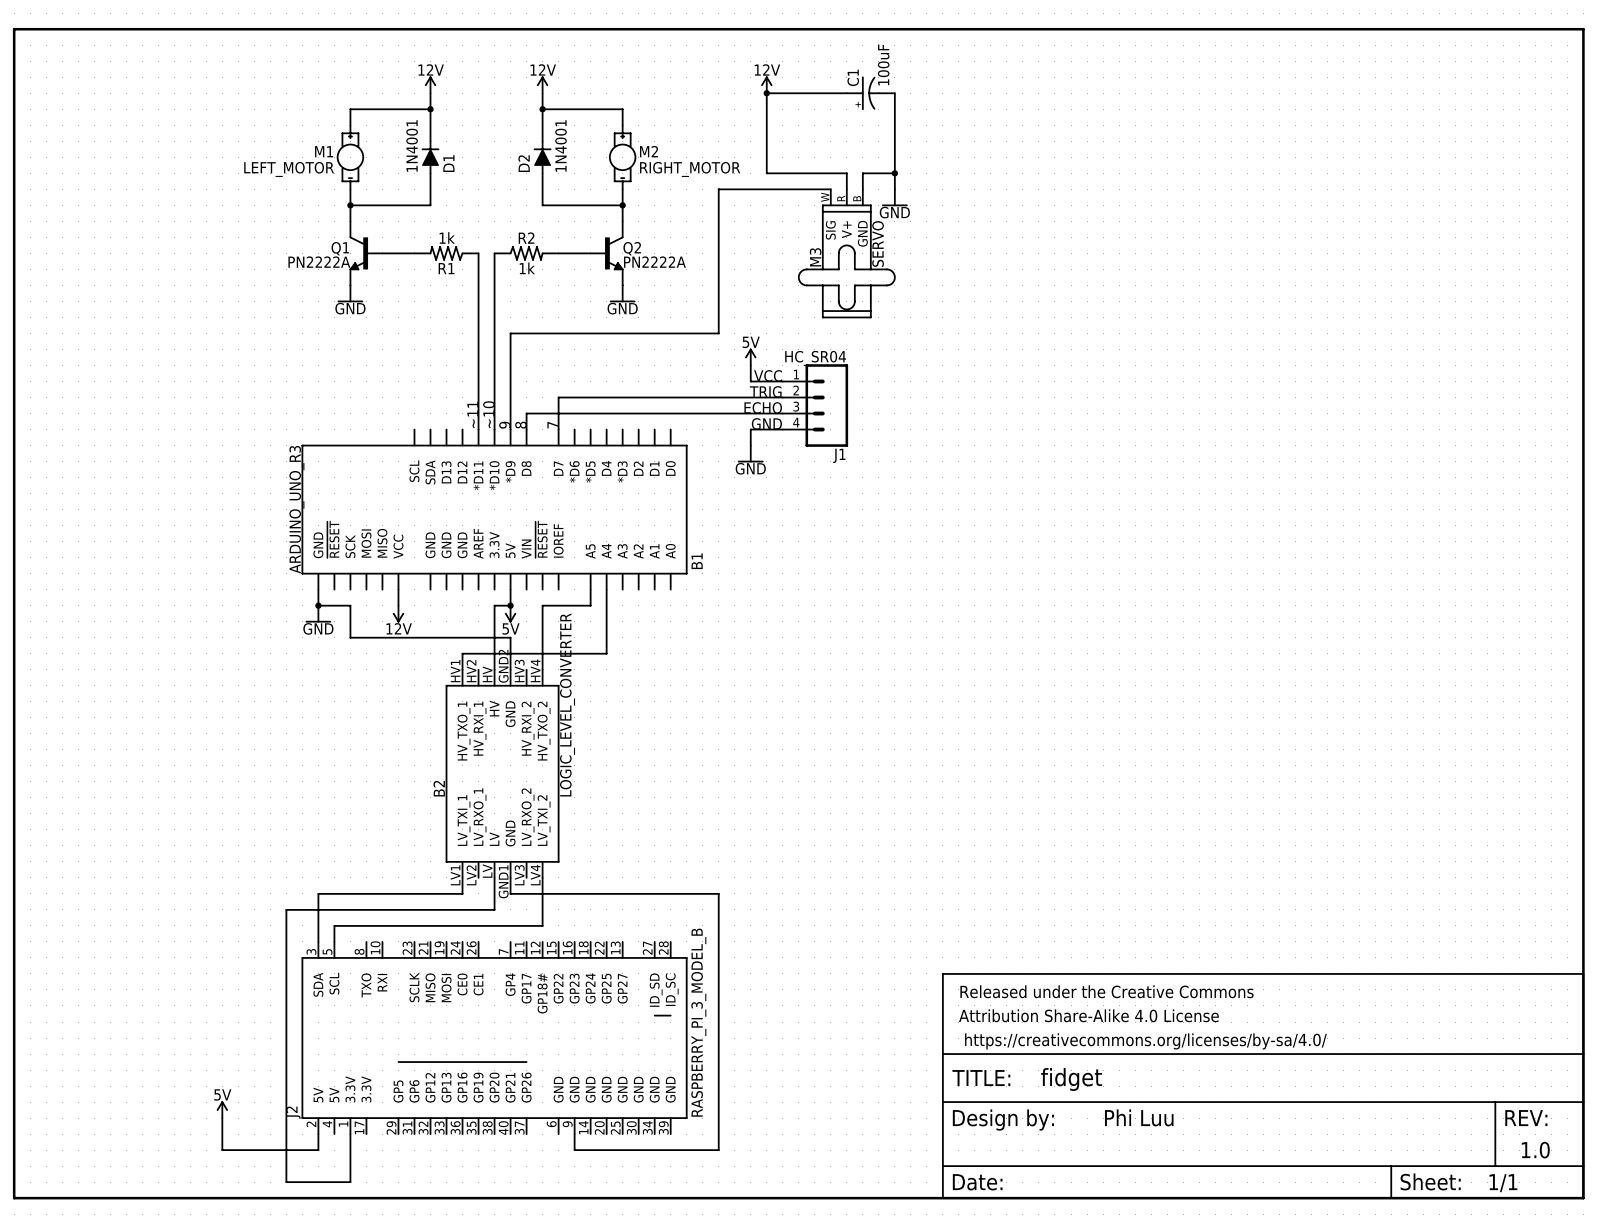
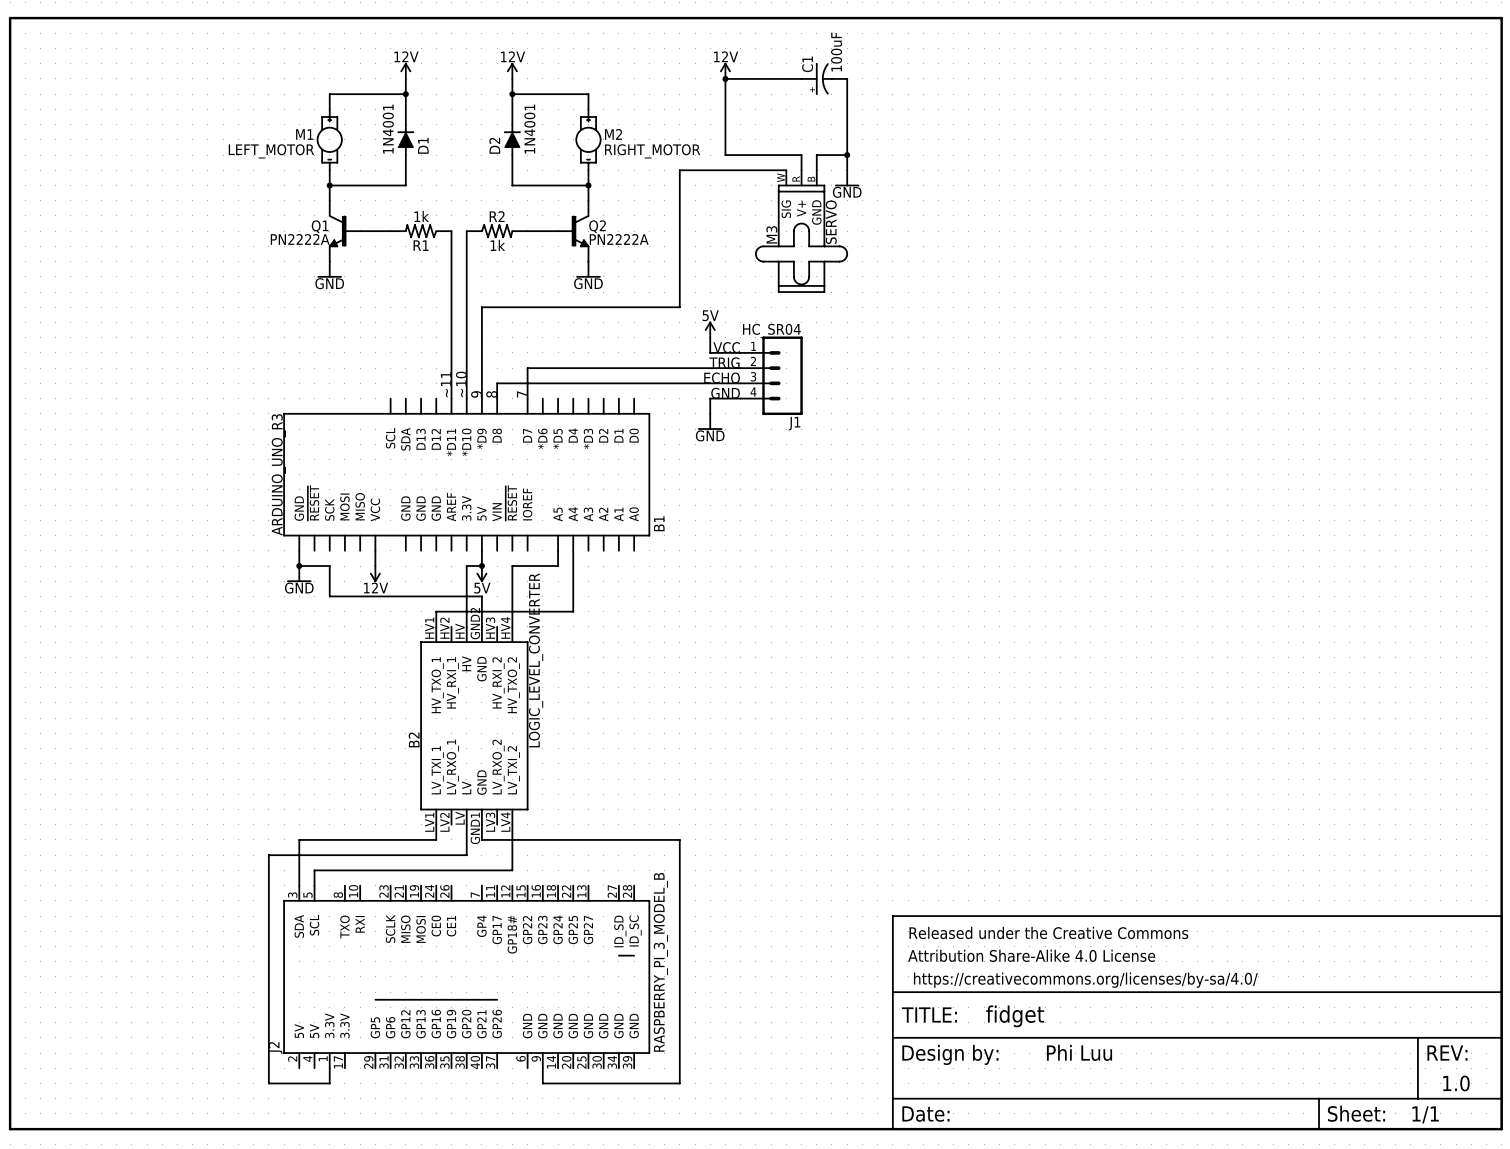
power symbol: 5V (222, 1109) -> none
wire: (222, 1118) (222, 1150) (286, 1150) (286, 1182) (350, 1182) (350, 1150) -> none
wire: (318, 1134) (318, 1150) -> (329, 1083) (299, 1083)

